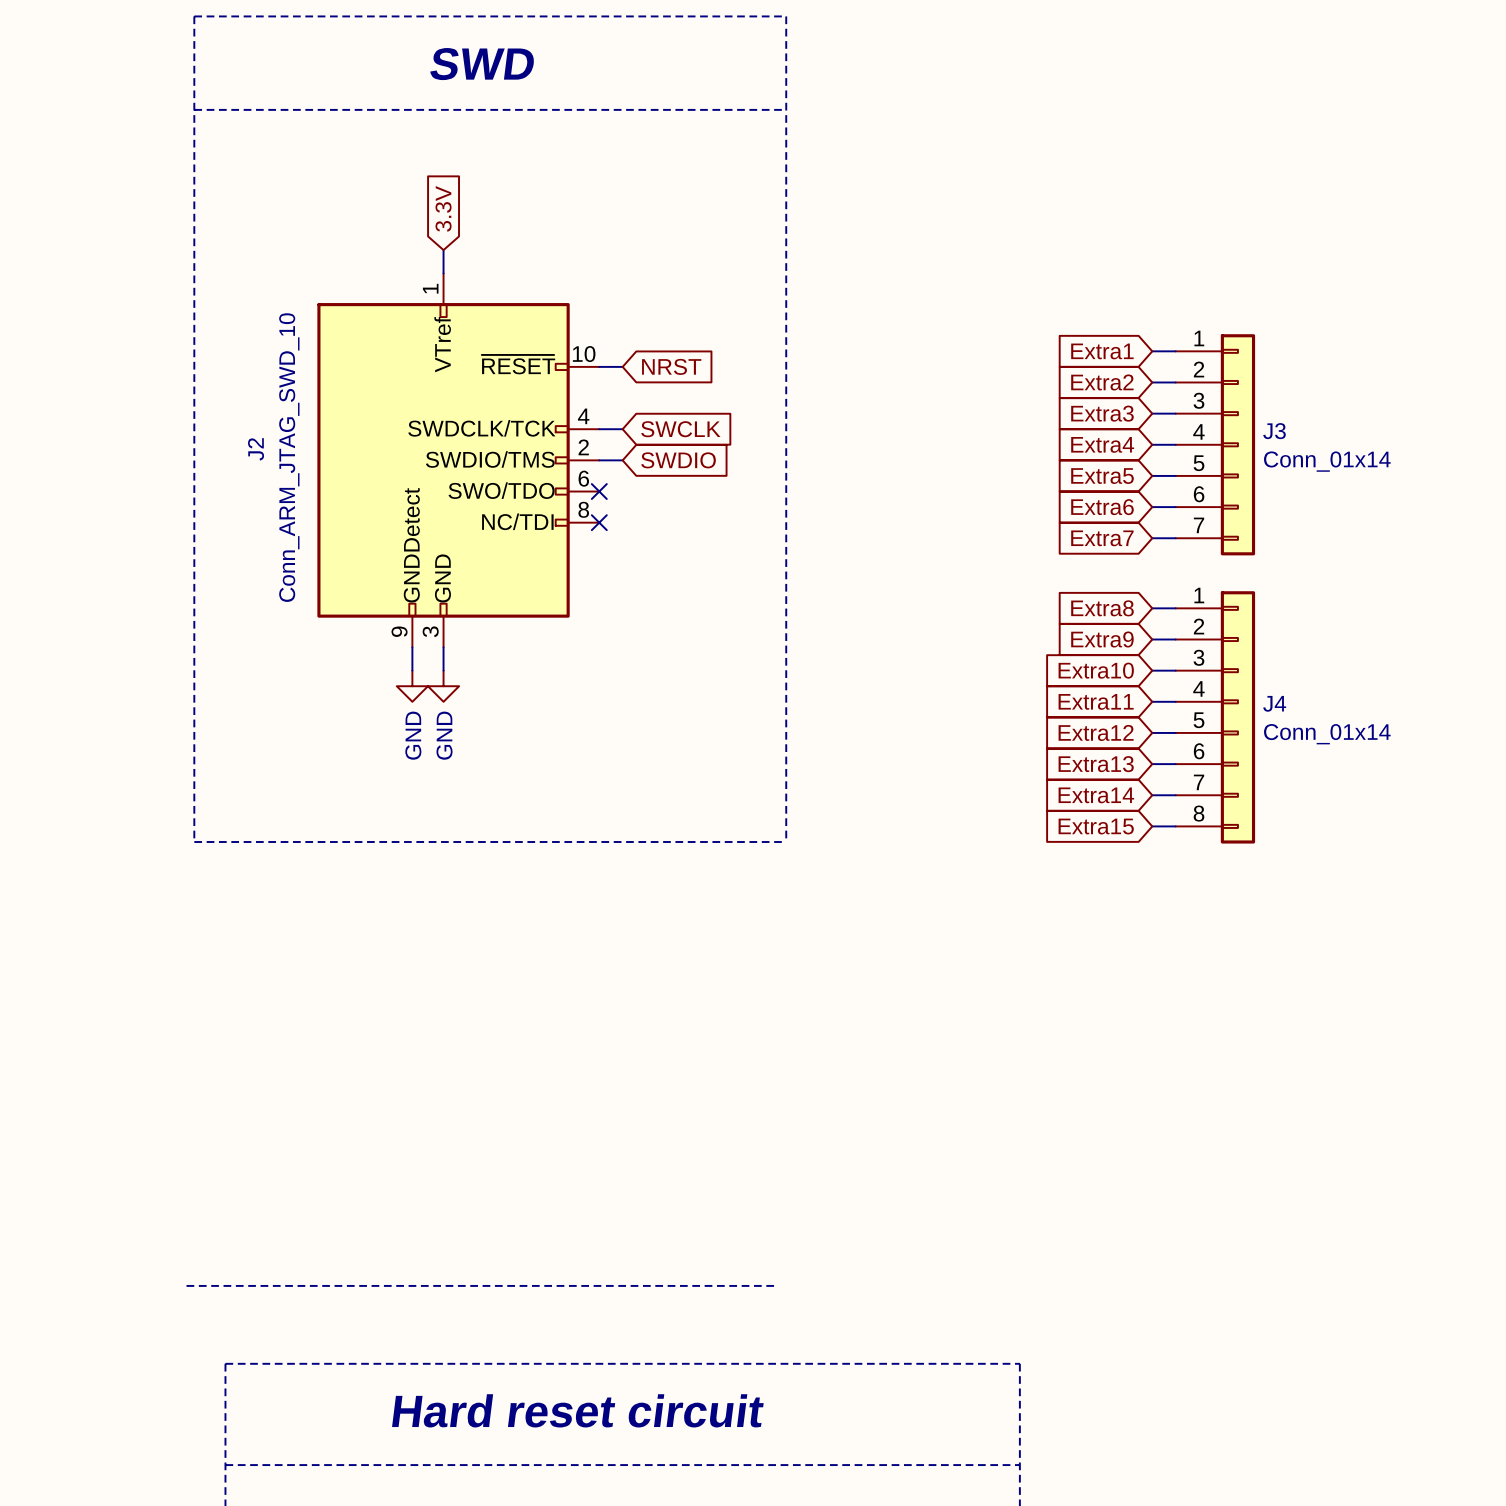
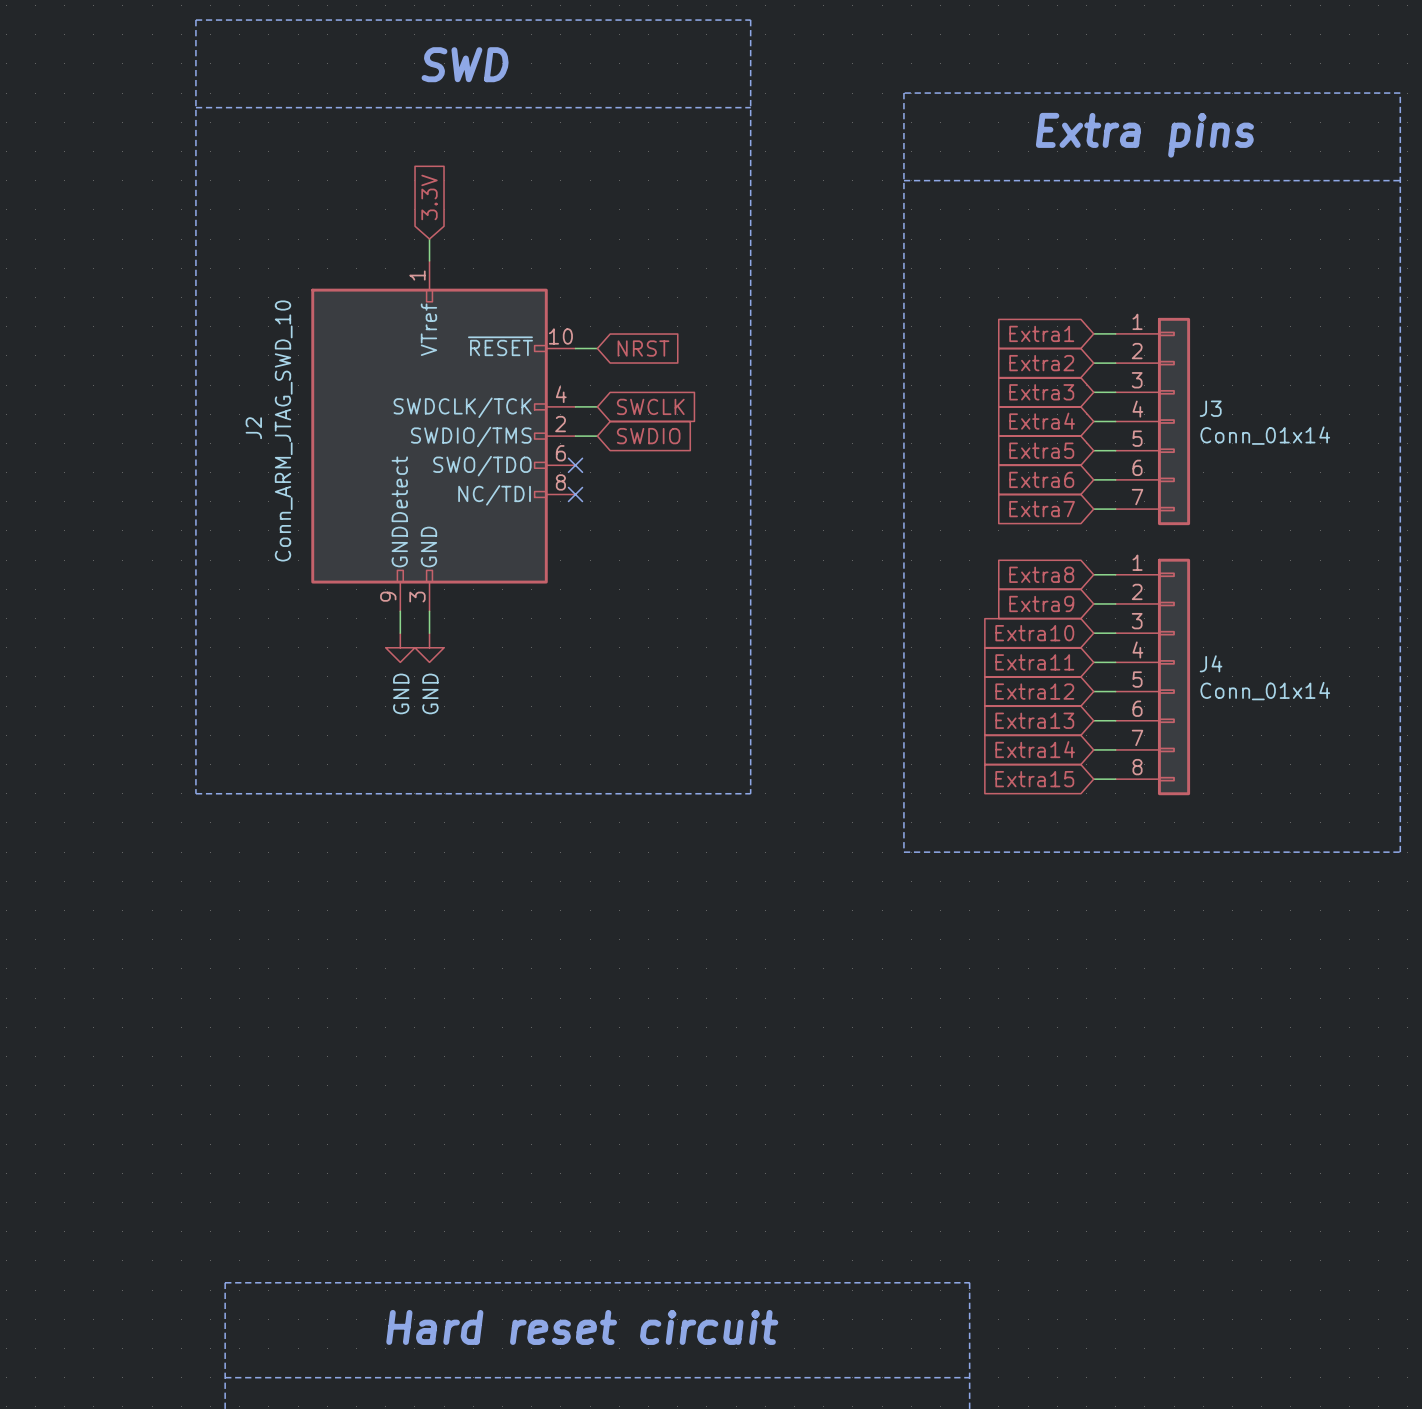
line: none -> (903, 93) (1400, 93) (1400, 852) (903, 852) (903, 93)
text: none -> Extra pins (1144, 135)
line: none -> (903, 180) (1400, 180)
line: (186, 1285) (778, 1285) -> none

